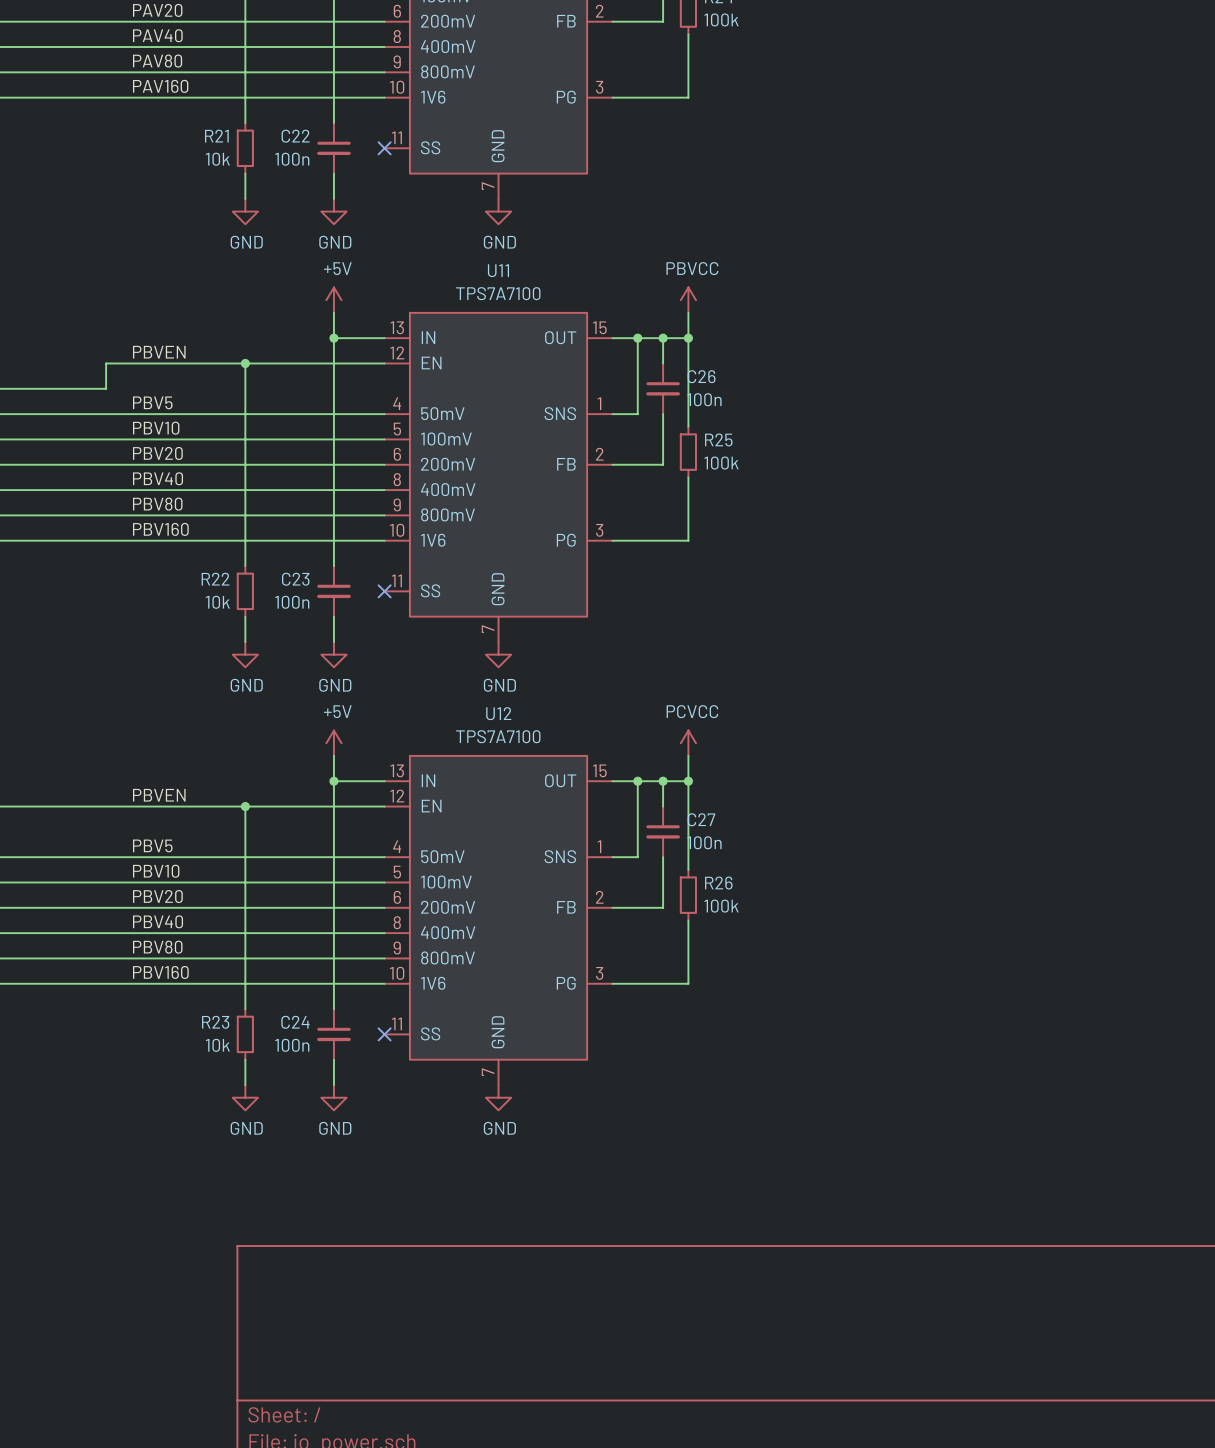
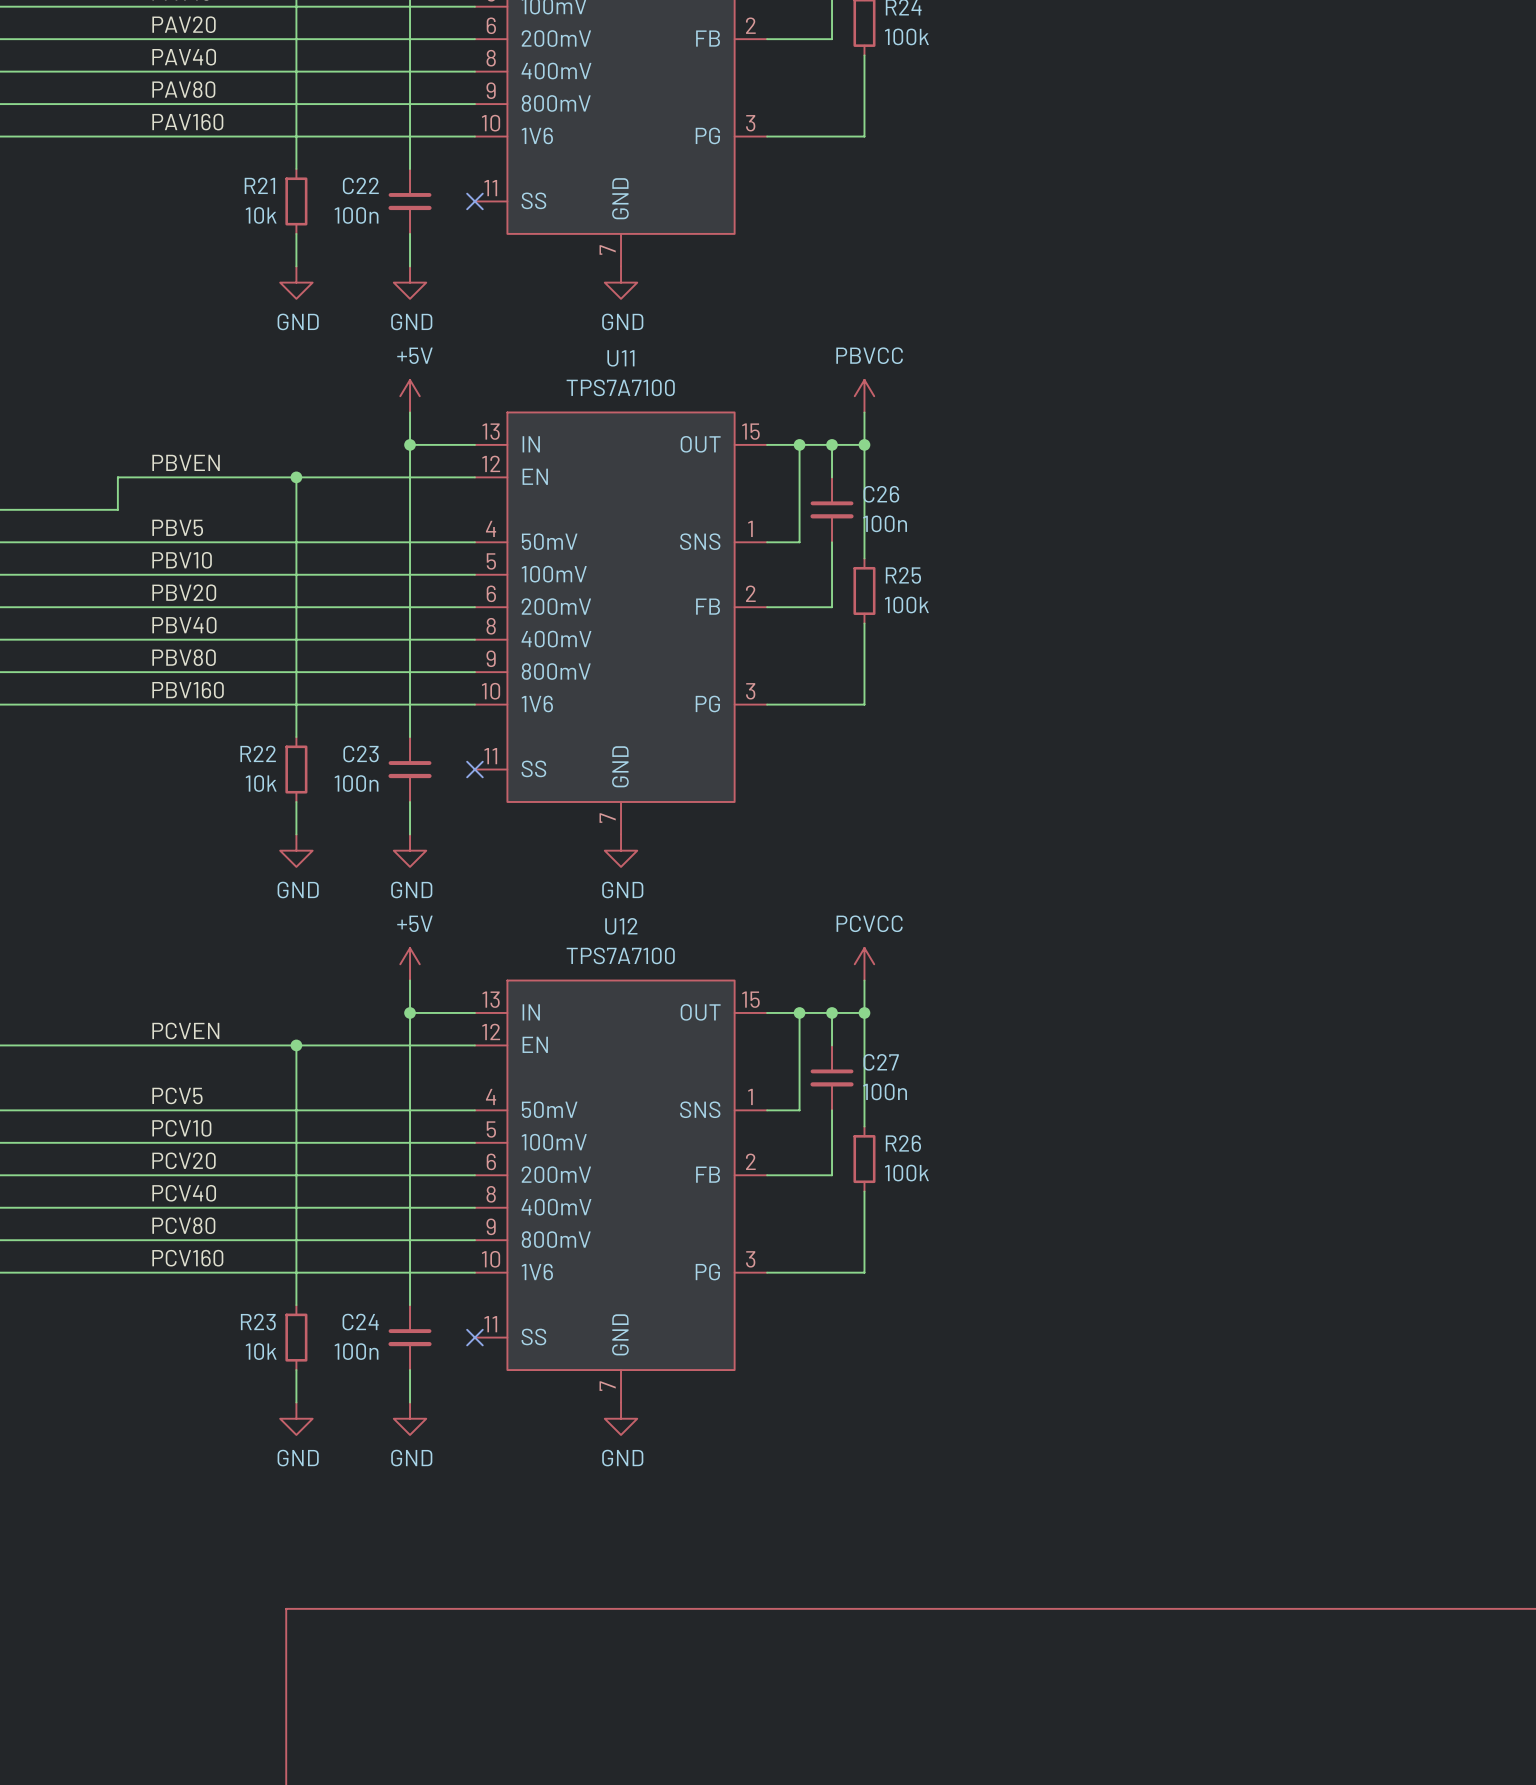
label: PBVEN (159, 795) -> PCVEN (185, 1030)
label: PBV5 (152, 845) -> PCV5 (177, 1095)
label: PBV10 (156, 871) -> PCV10 (181, 1128)
label: PBV20 (157, 896) -> PCV20 (184, 1160)
label: PBV40 (158, 921) -> PCV40 (184, 1193)
label: PBV80 (157, 947) -> PCV80 (183, 1225)
label: PBV160 (160, 972) -> PCV160 (187, 1258)

